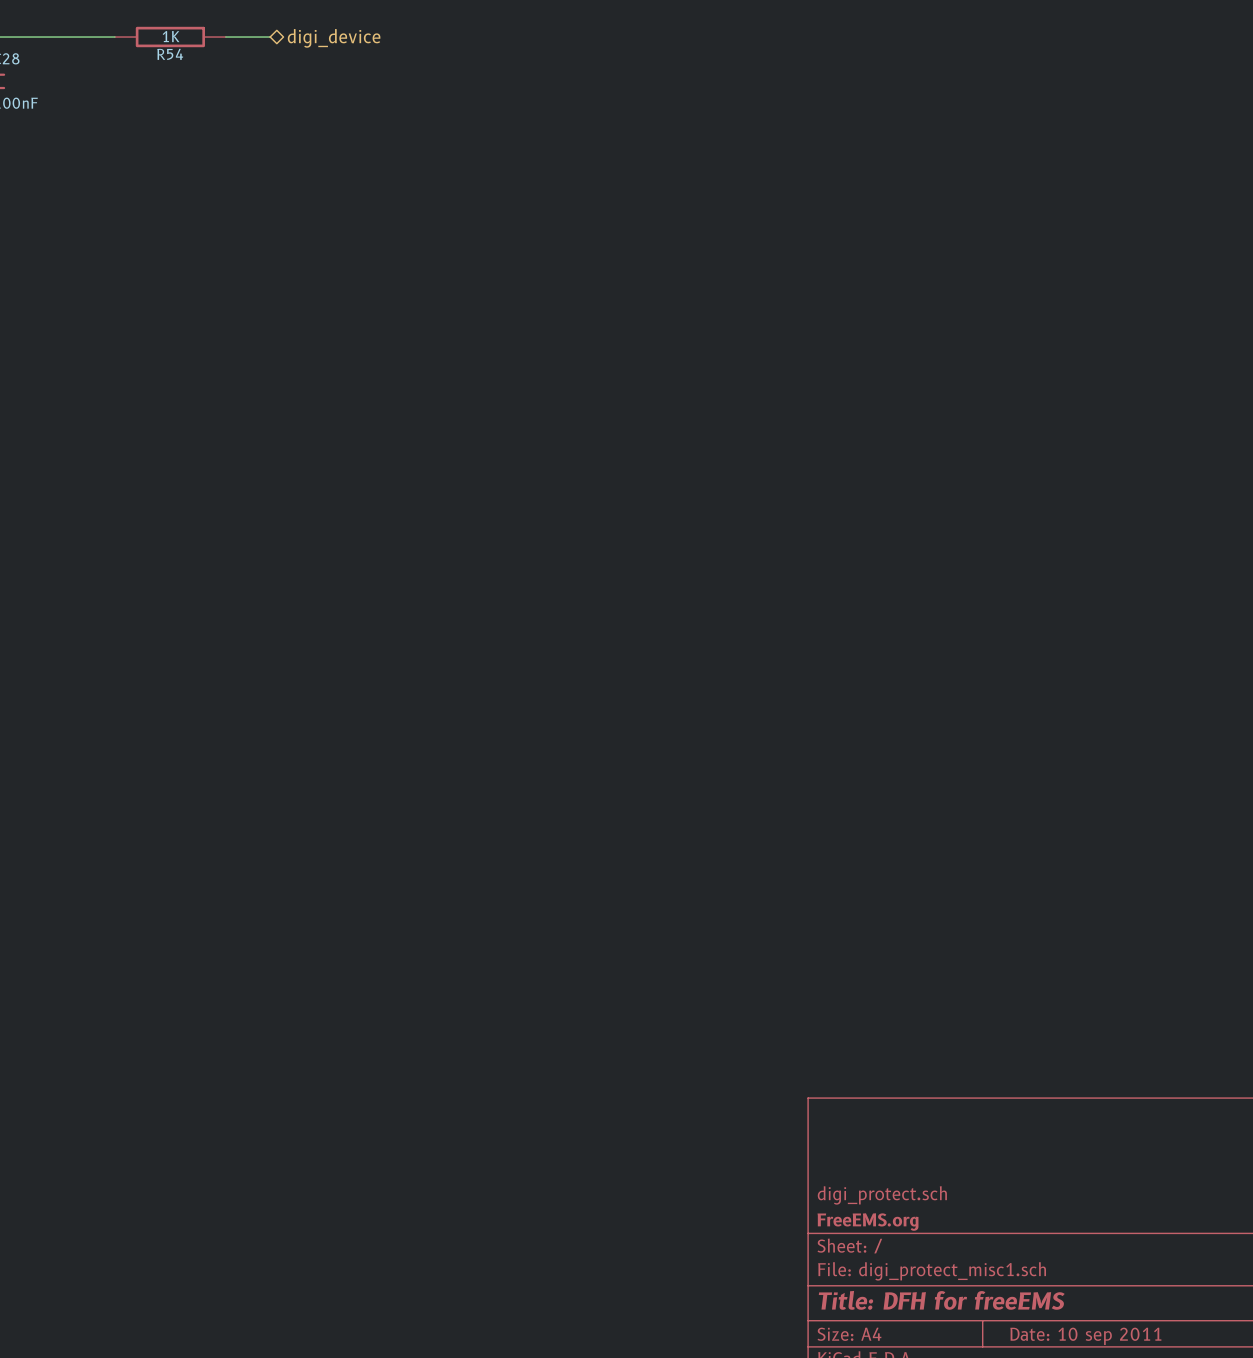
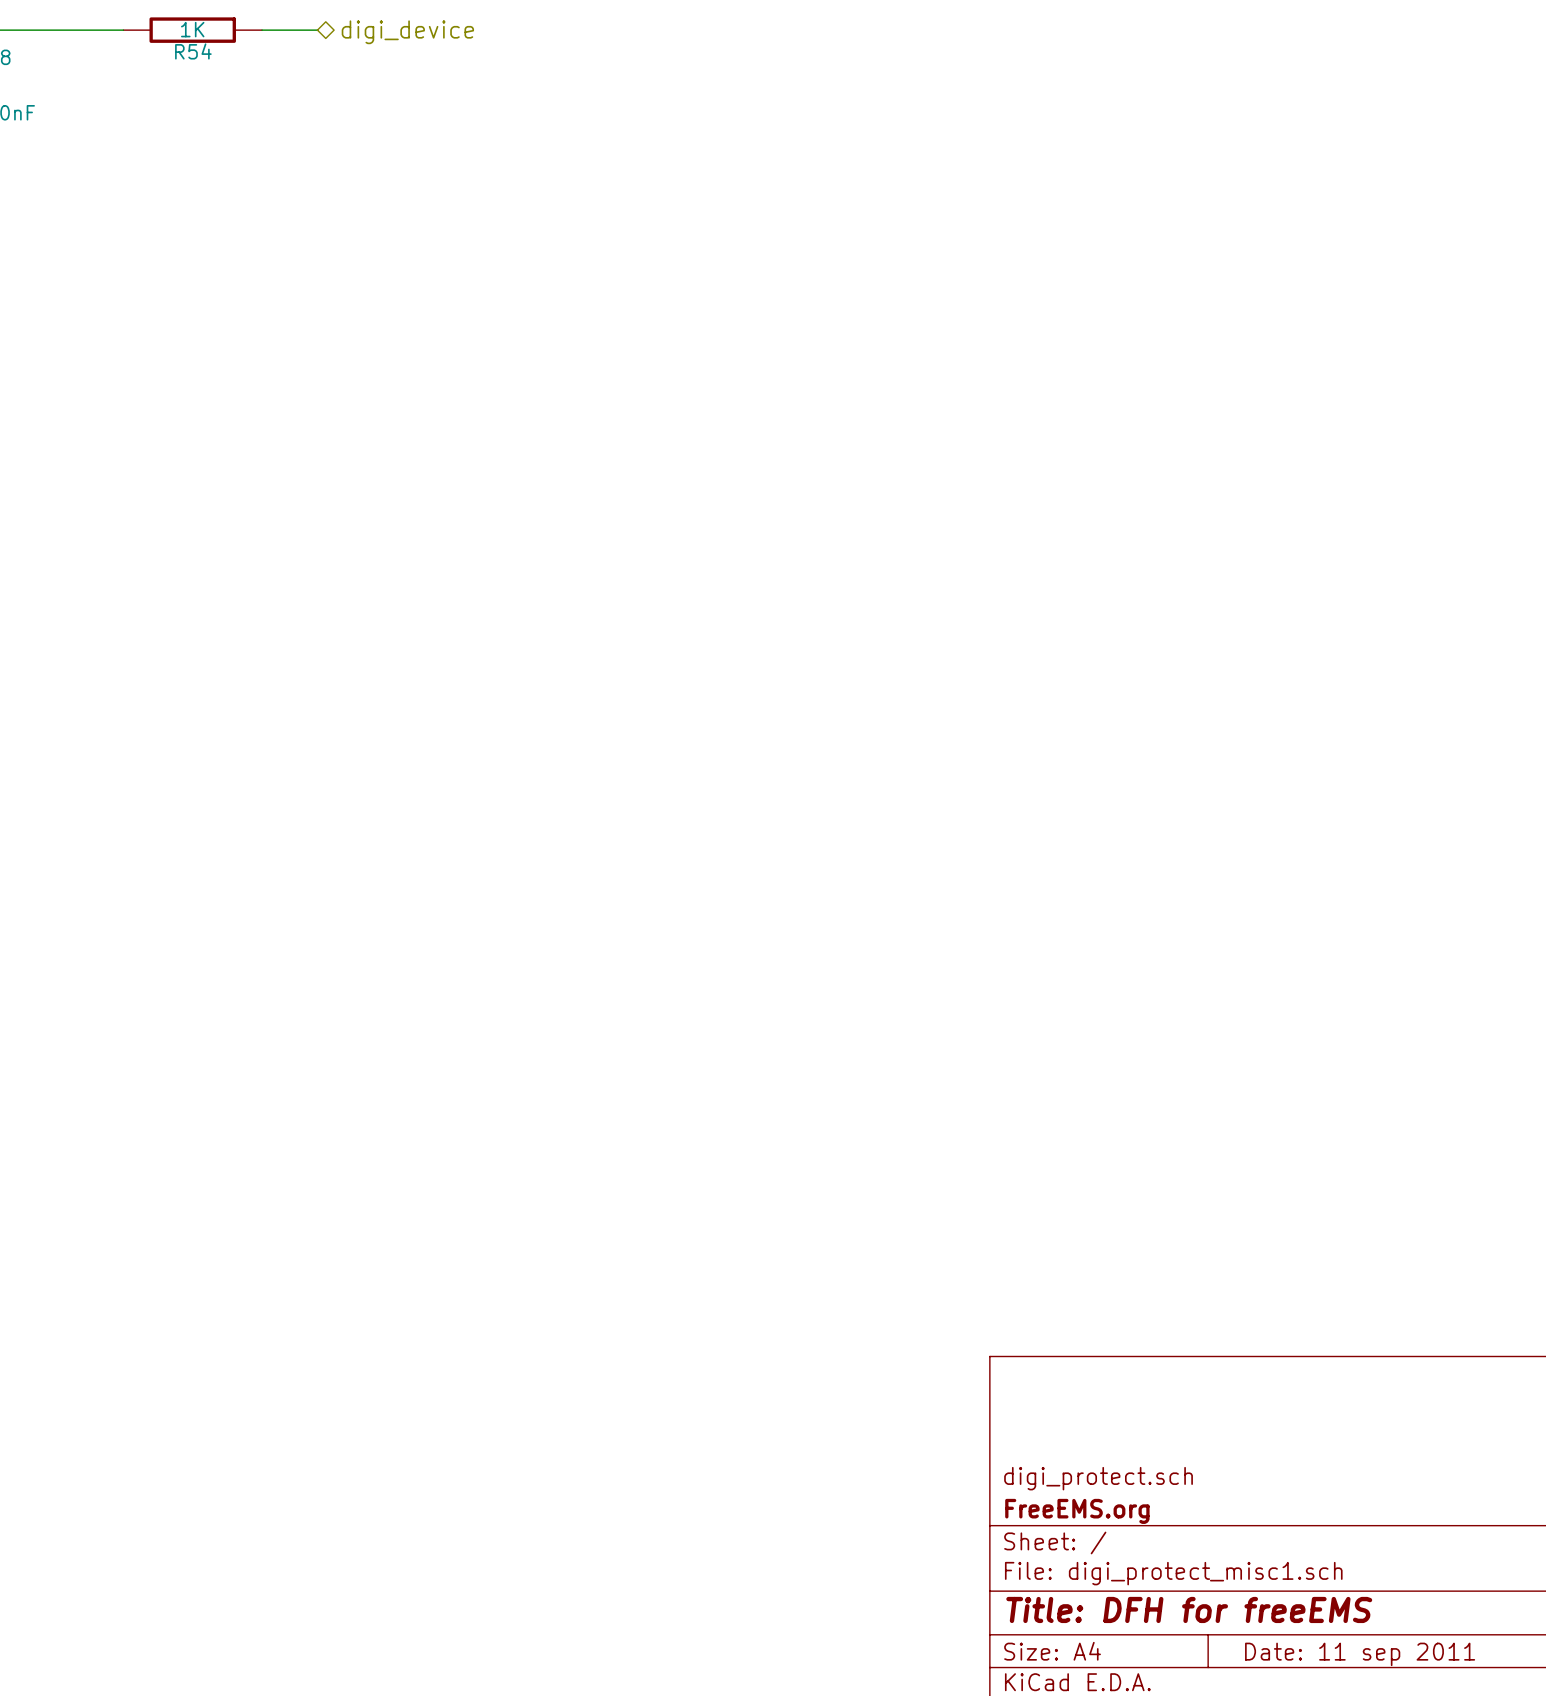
title block: Date: 10 sep 2011 (1085, 1336) -> Date: 11 sep 2011 (1360, 1654)

